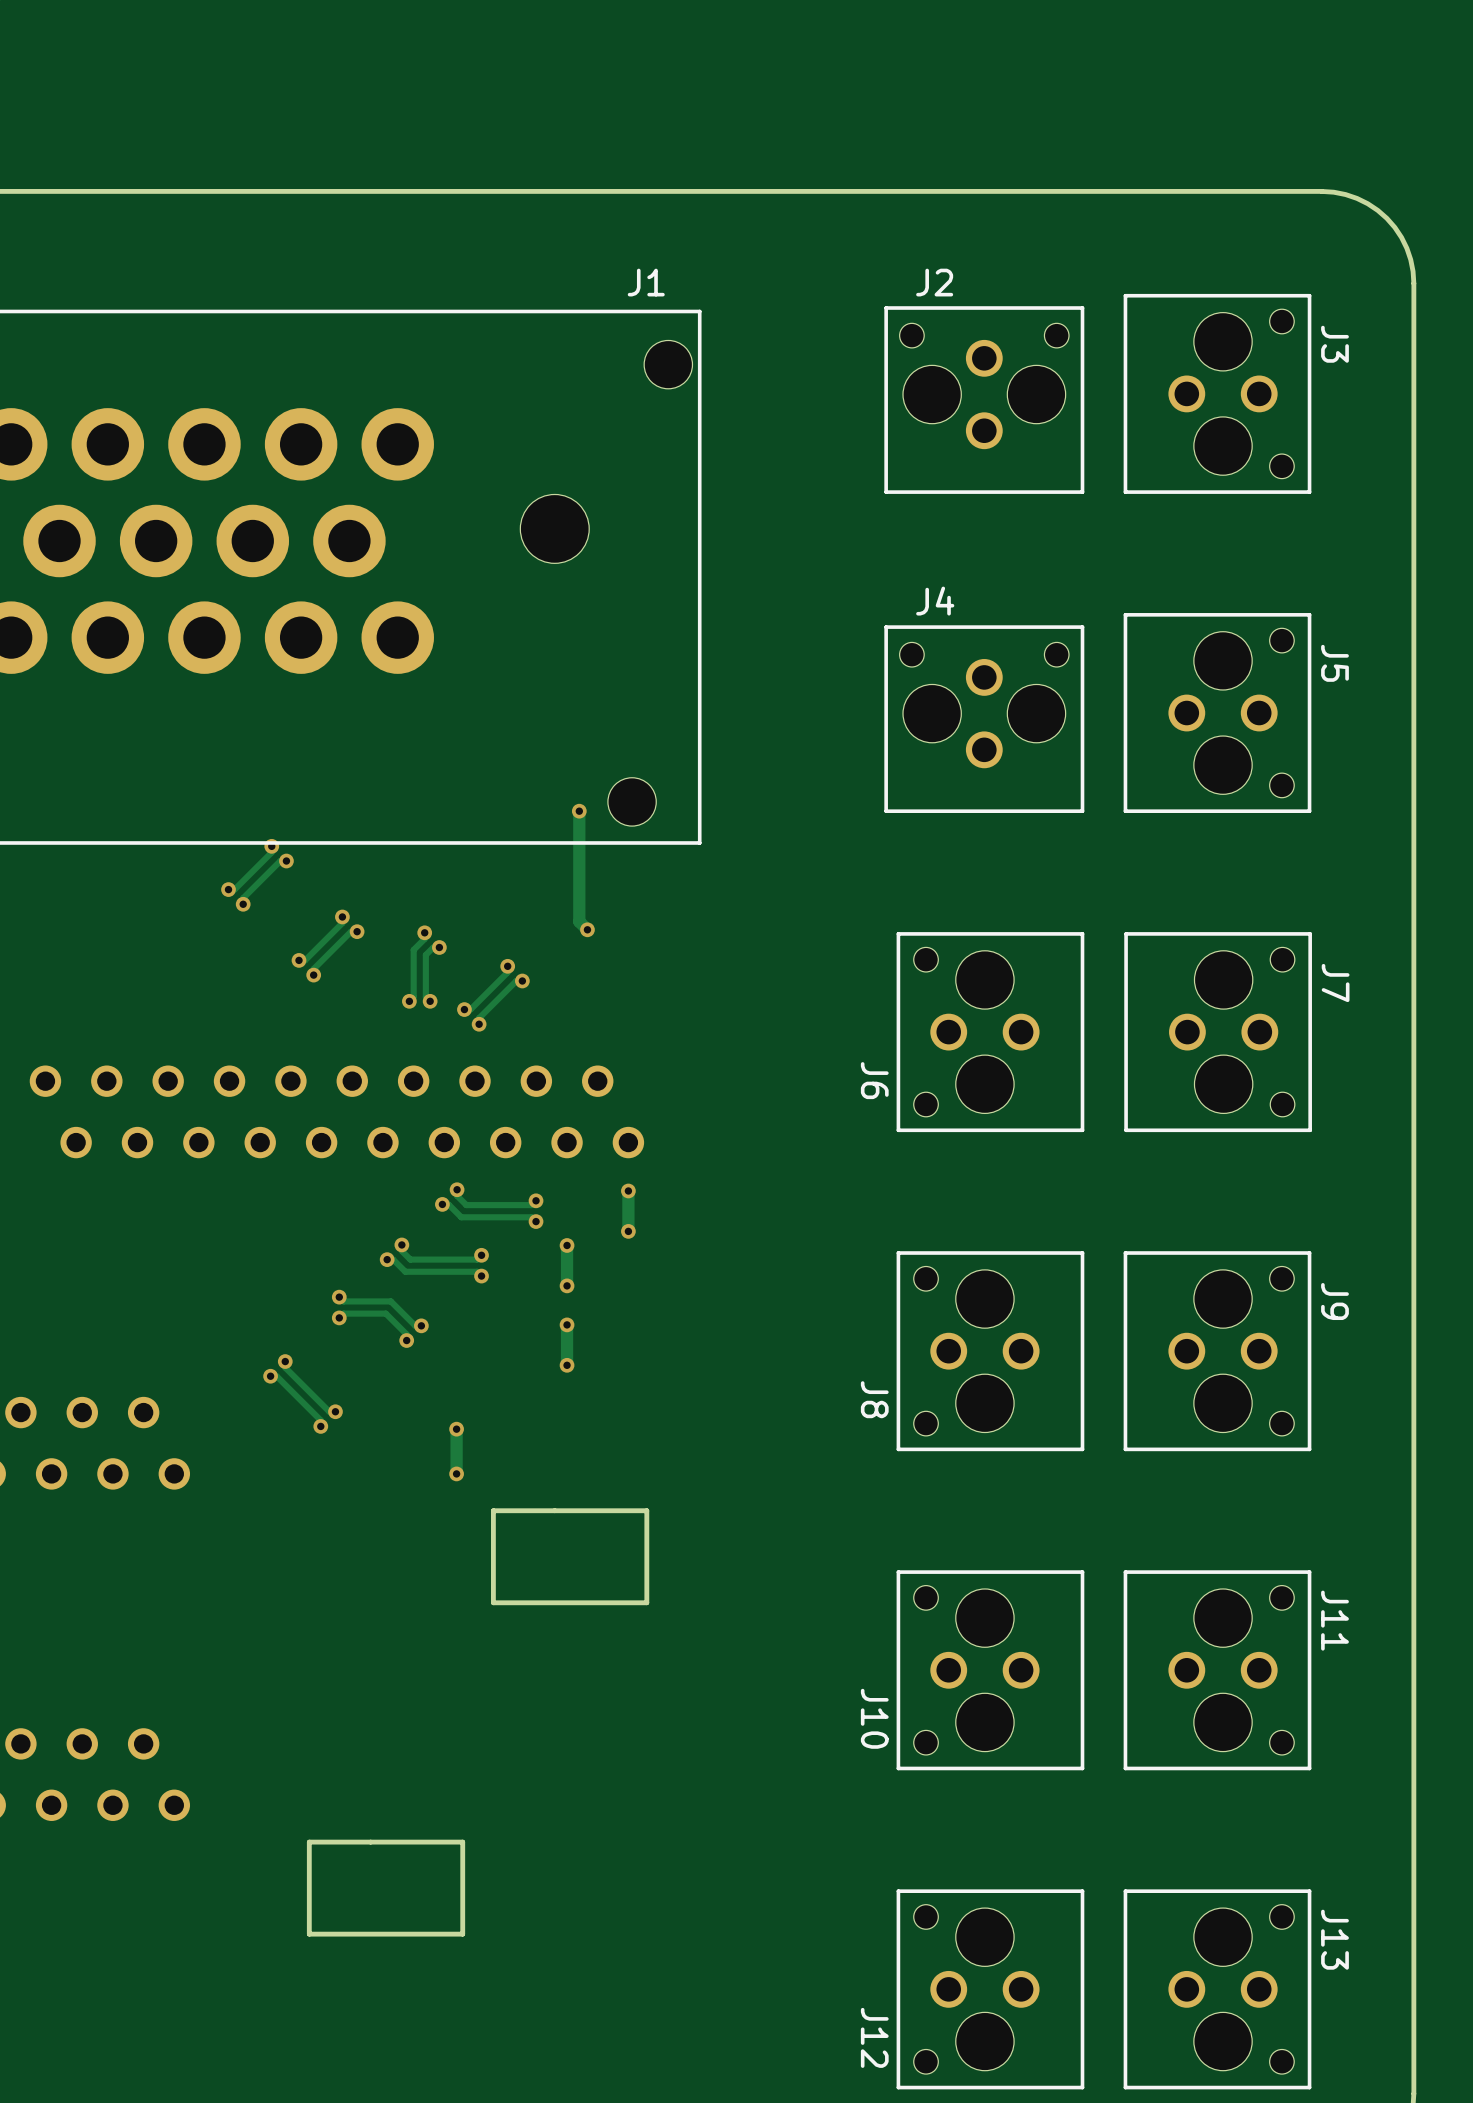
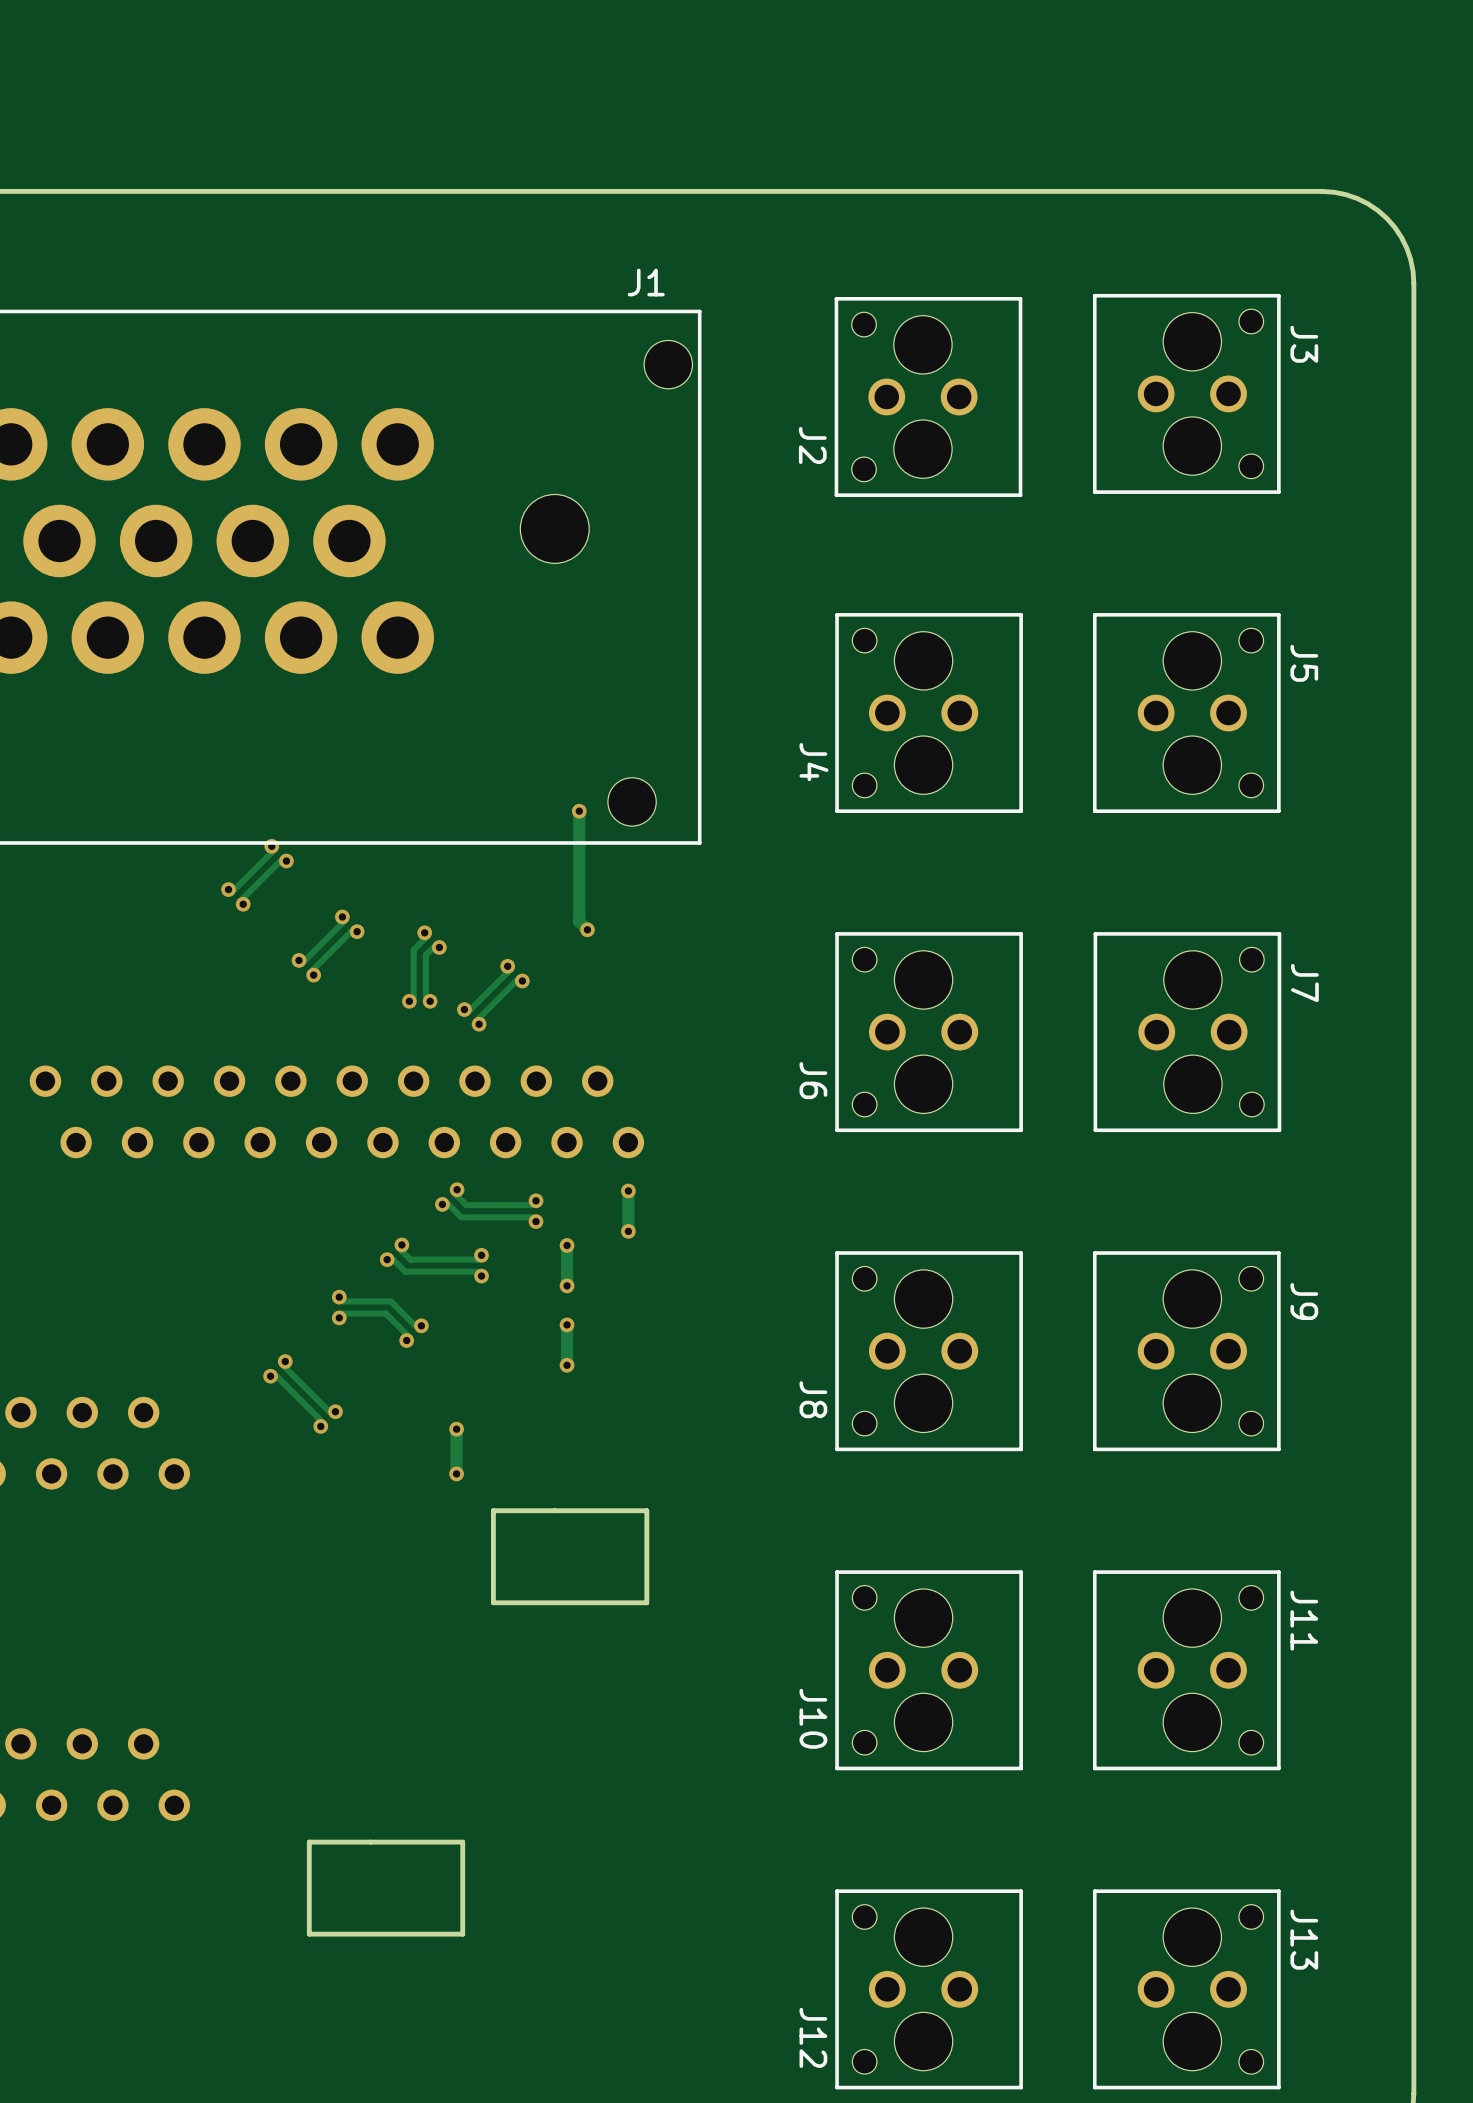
J3 position: (1217, 393) -> (1186, 393)
J2 rotation: 0° (984, 400) -> 90° counterclockwise (928, 396)
J5 position: (1217, 713) -> (1186, 713)
J4 rotation: 0° (984, 719) -> 90° counterclockwise (929, 713)
J6 position: (990, 1032) -> (929, 1032)
J7 position: (1218, 1032) -> (1187, 1032)
J8 position: (990, 1351) -> (929, 1351)
J9 position: (1217, 1351) -> (1186, 1351)
J10 position: (990, 1670) -> (929, 1670)
J11 position: (1217, 1670) -> (1186, 1670)
J12 position: (990, 1989) -> (929, 1989)
J13 position: (1217, 1989) -> (1186, 1989)

